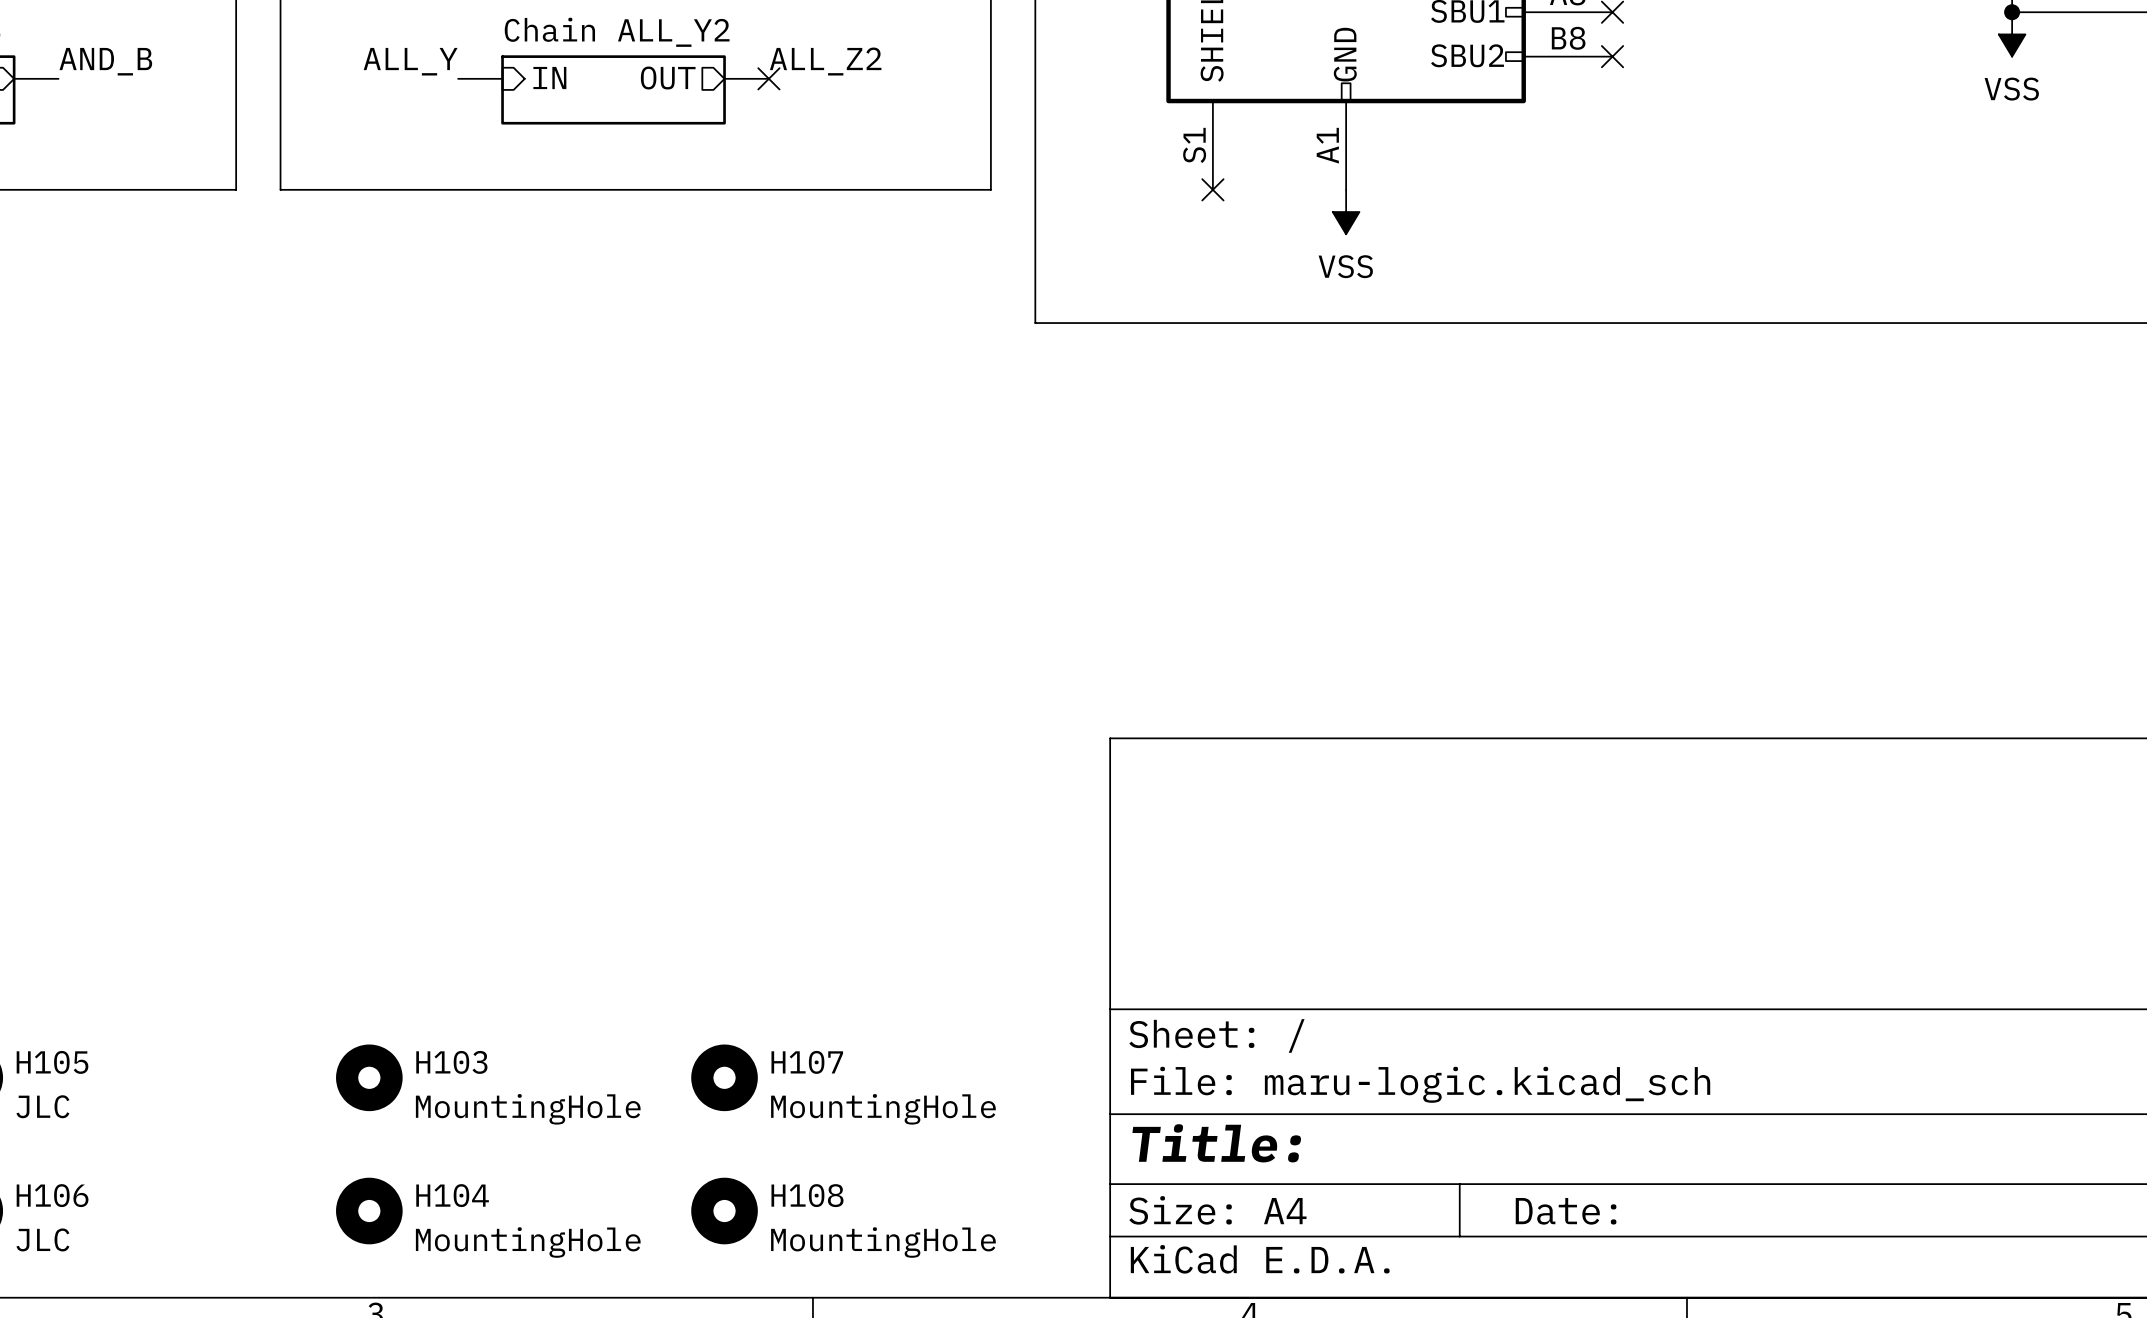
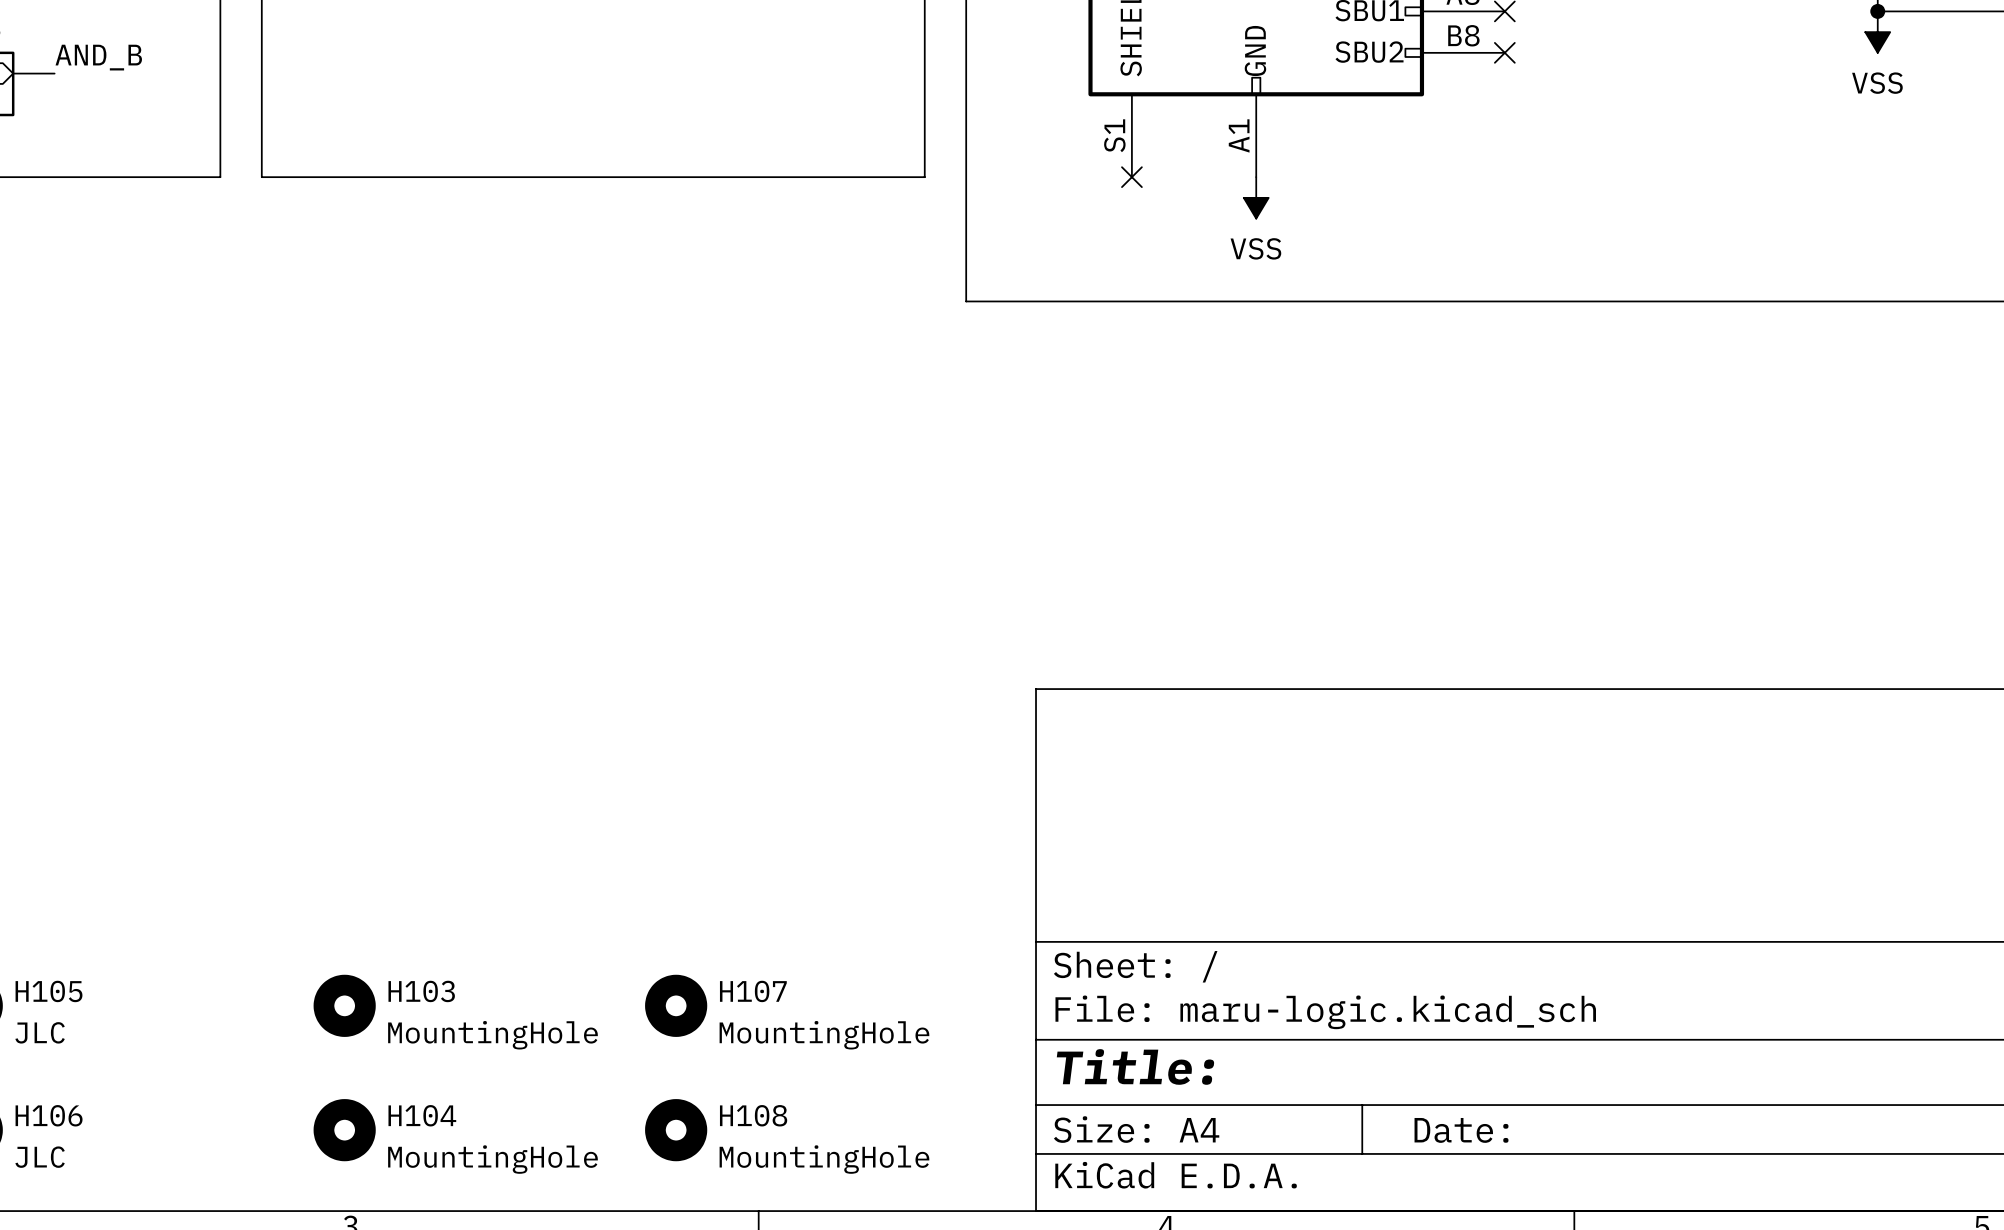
label: ALL_Y (410, 61) -> none
label: ALL_Z2 (825, 61) -> none
wire: (458, 78) (502, 78) -> none
sheet pin: IN (549, 78) -> none
sheet pin: OUT (668, 78) -> none
wire: (724, 78) (768, 78) -> none
no-connect mark: (768, 78) -> none
sheet Chain ALL_Y2: (613, 89) -> none

